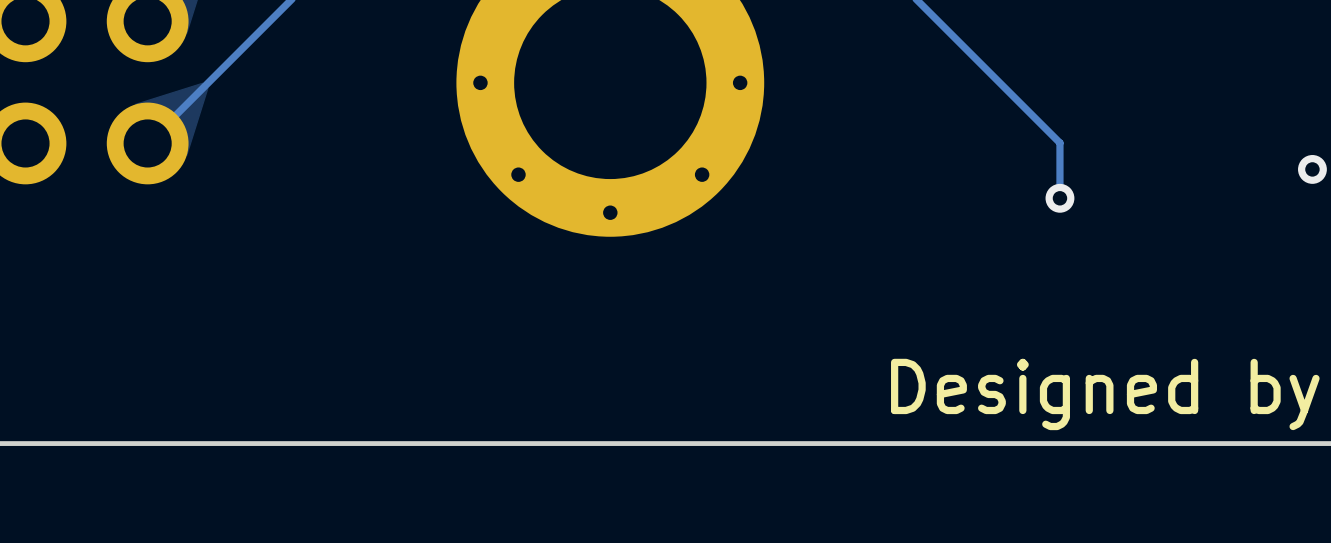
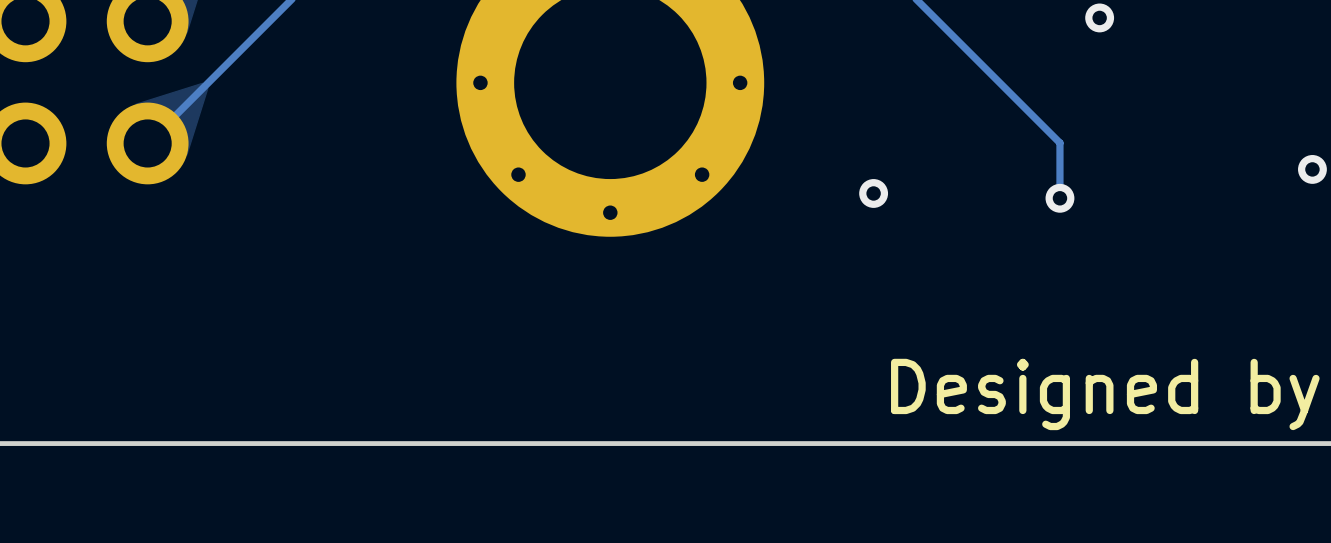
via: none -> (1099, 17)
via: none -> (873, 193)

